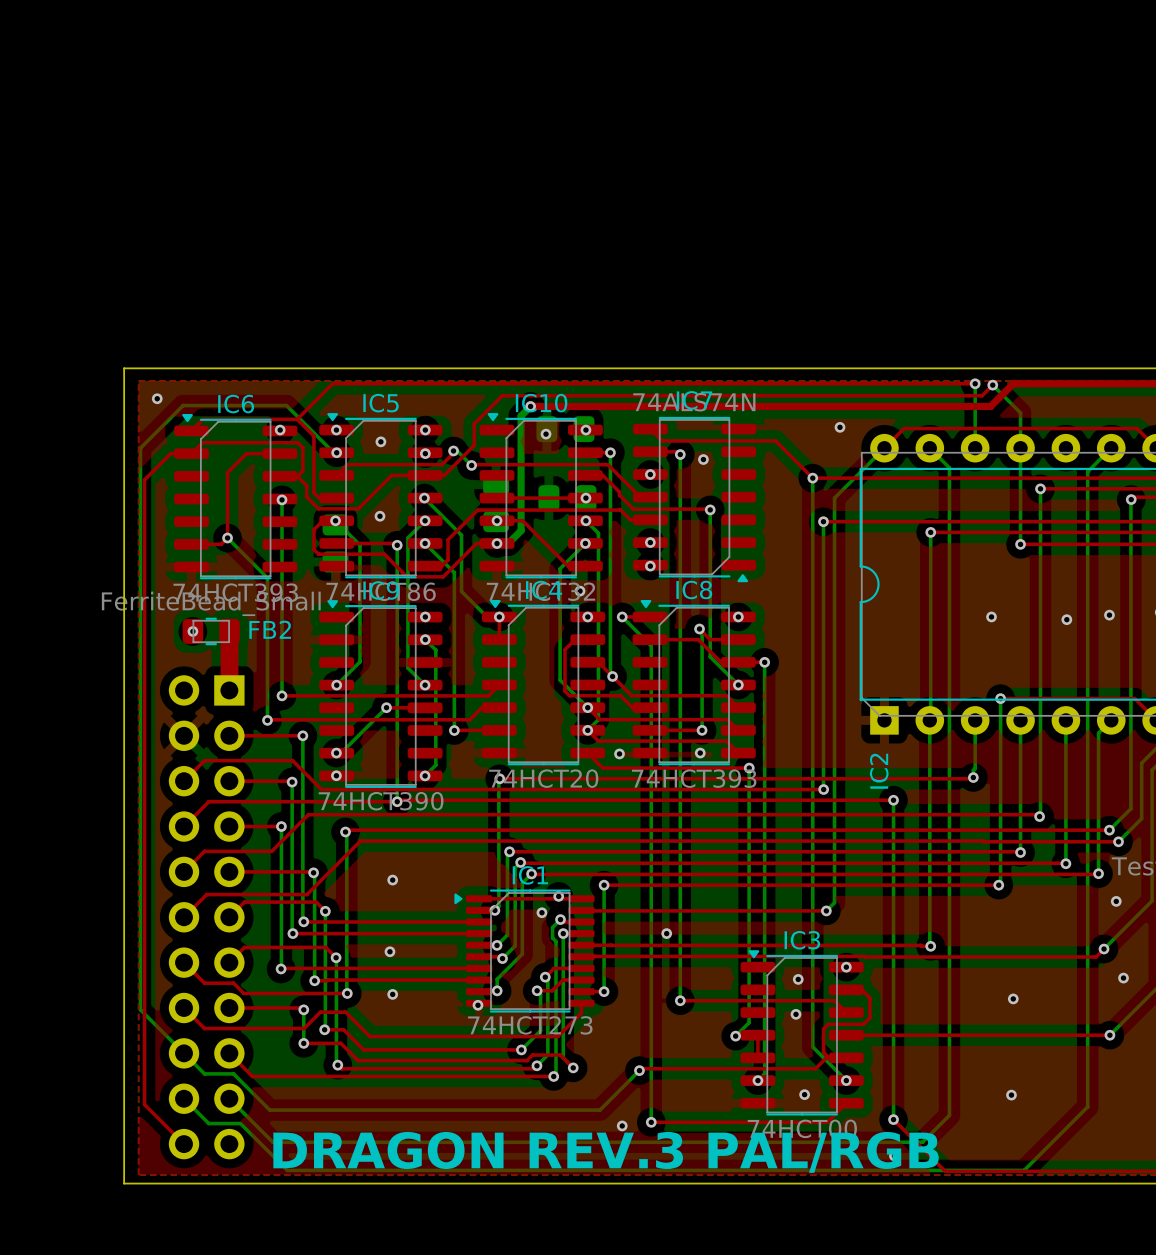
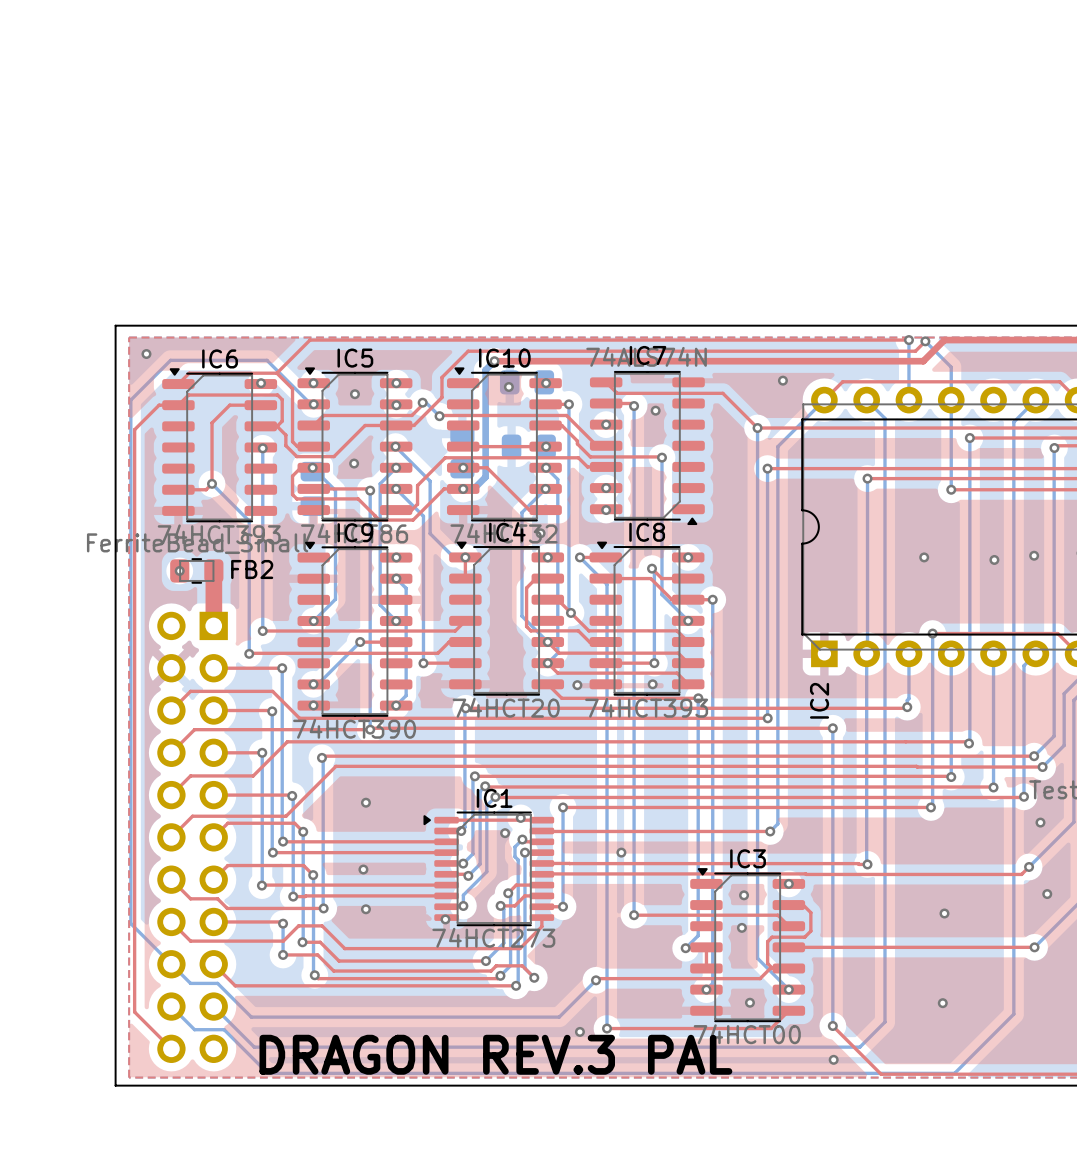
text: DRAGON REV.3 PAL/RGB (606, 1152) -> DRAGON REV.3 PAL (495, 1054)

